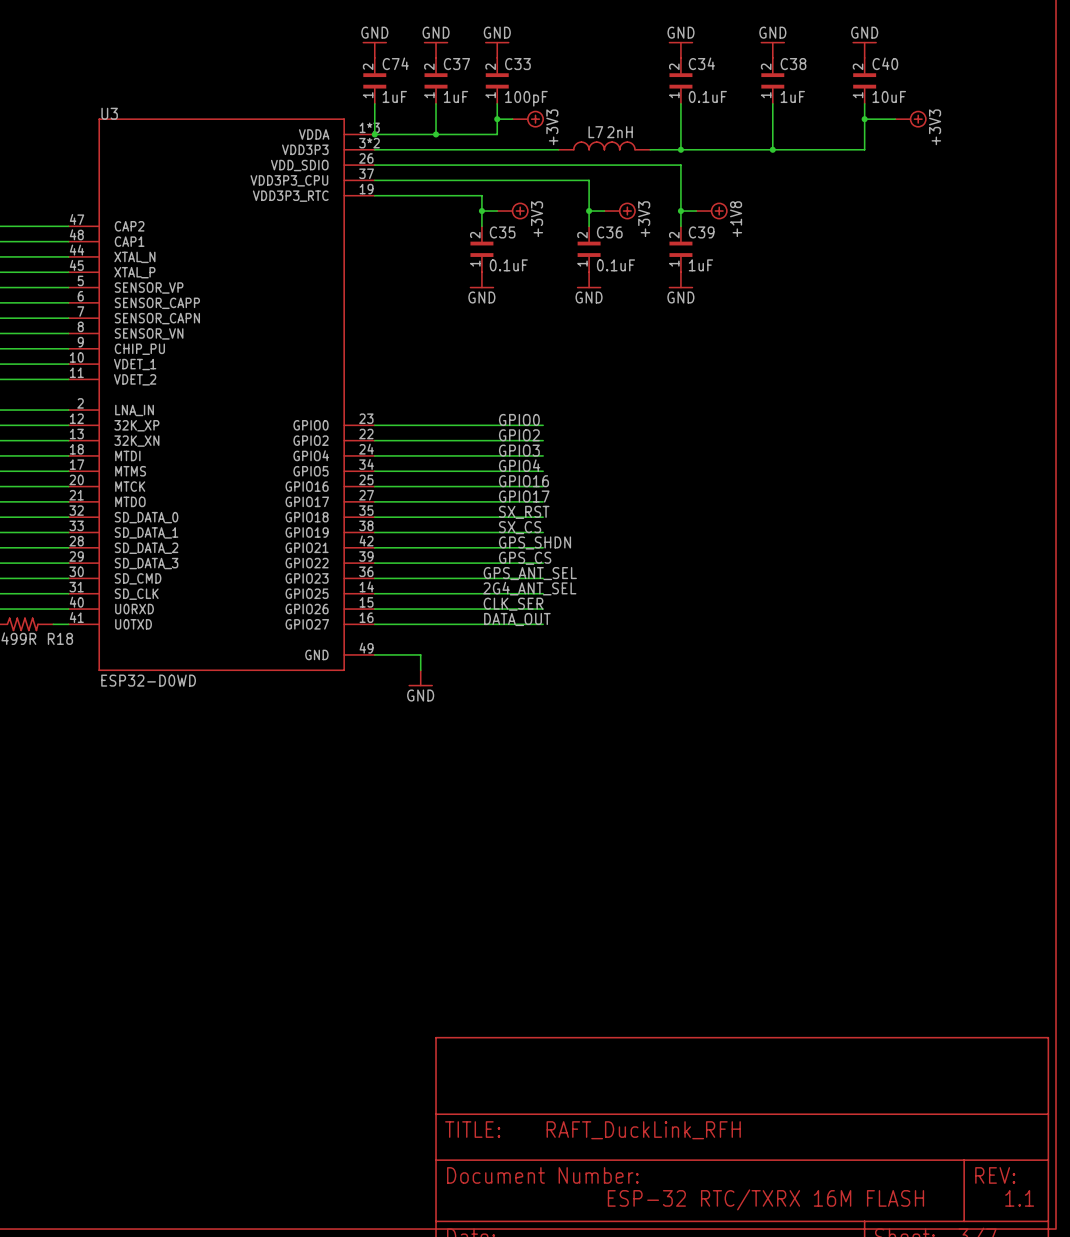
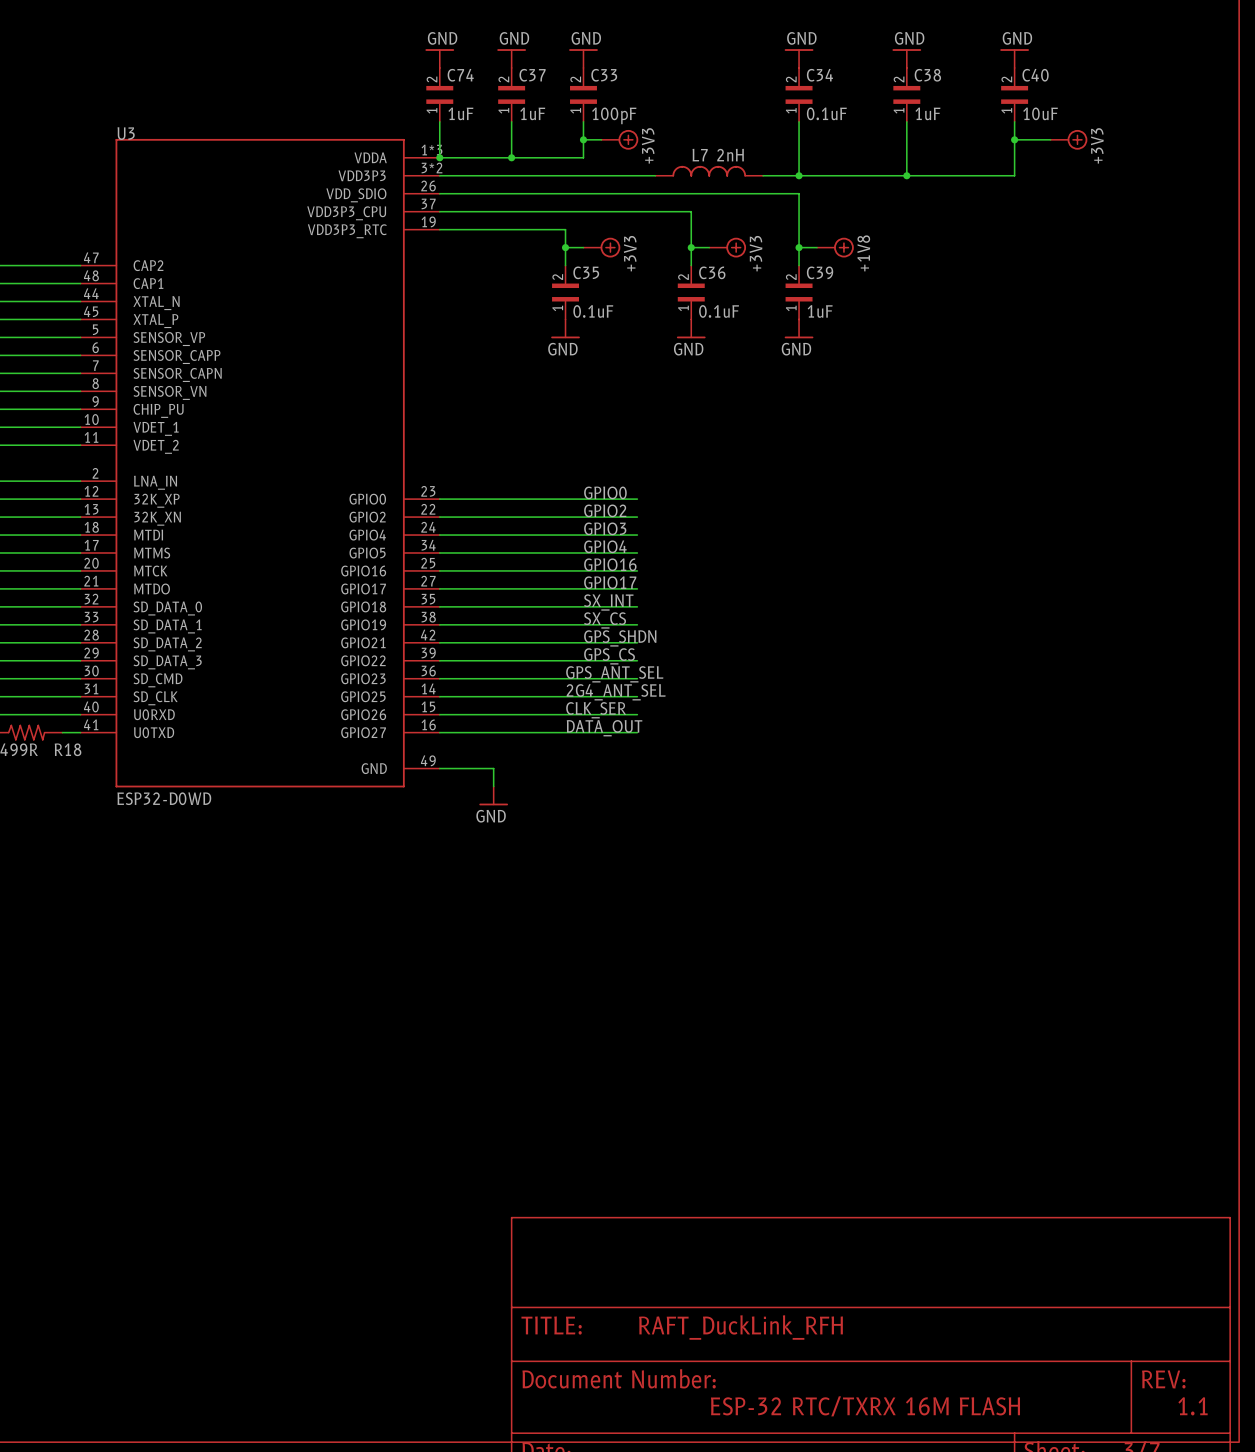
label: SX_RST (524, 512) -> SX_INT (608, 602)

